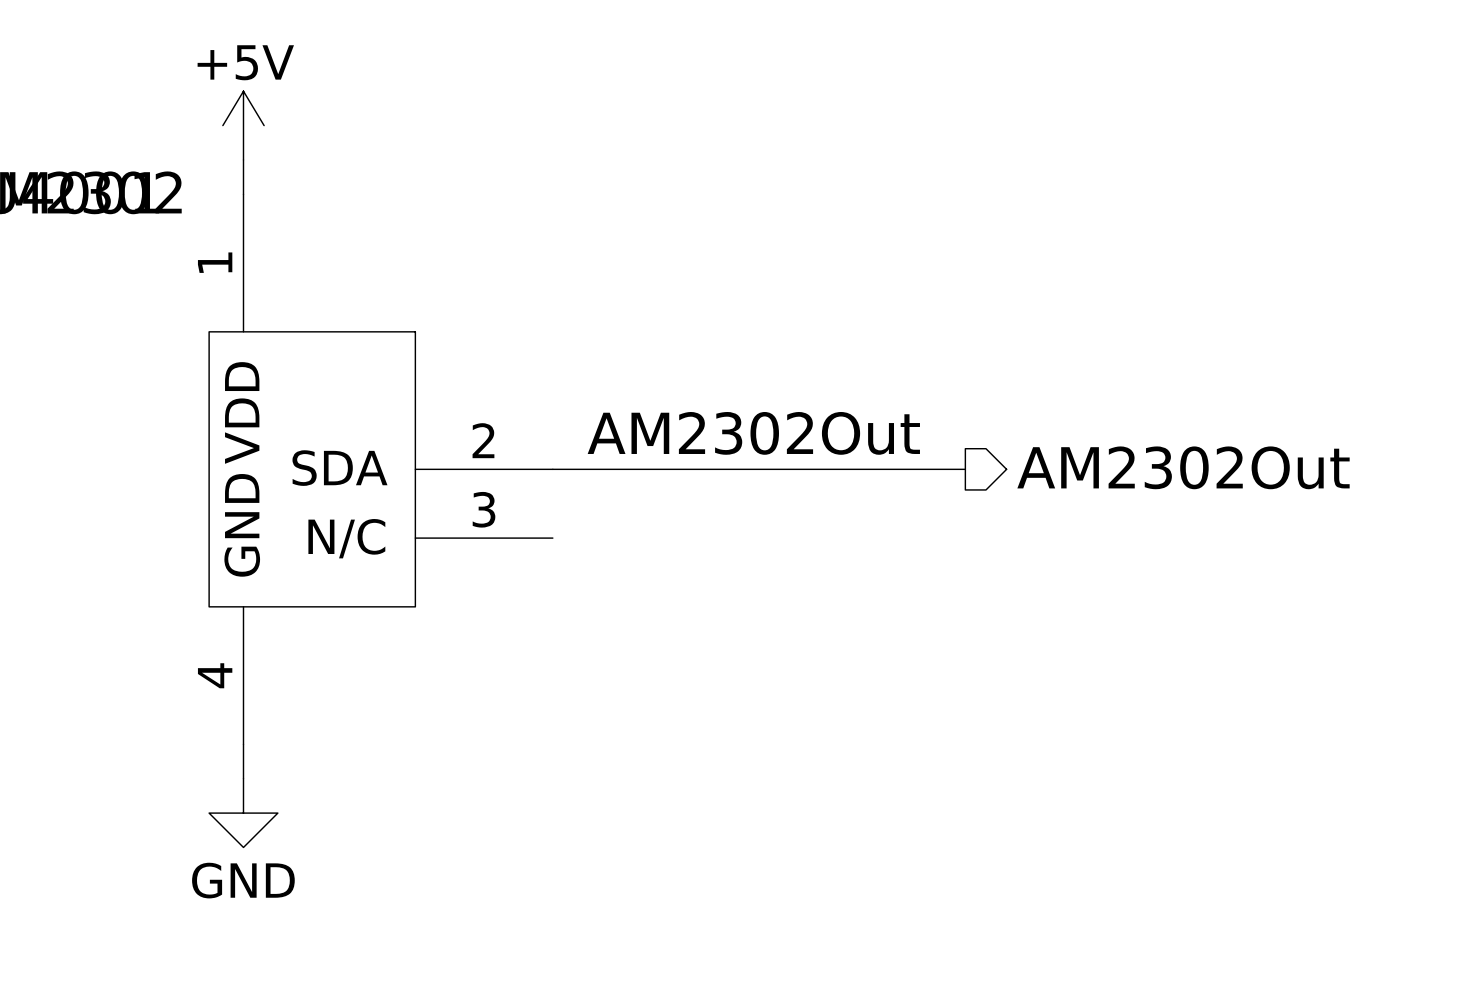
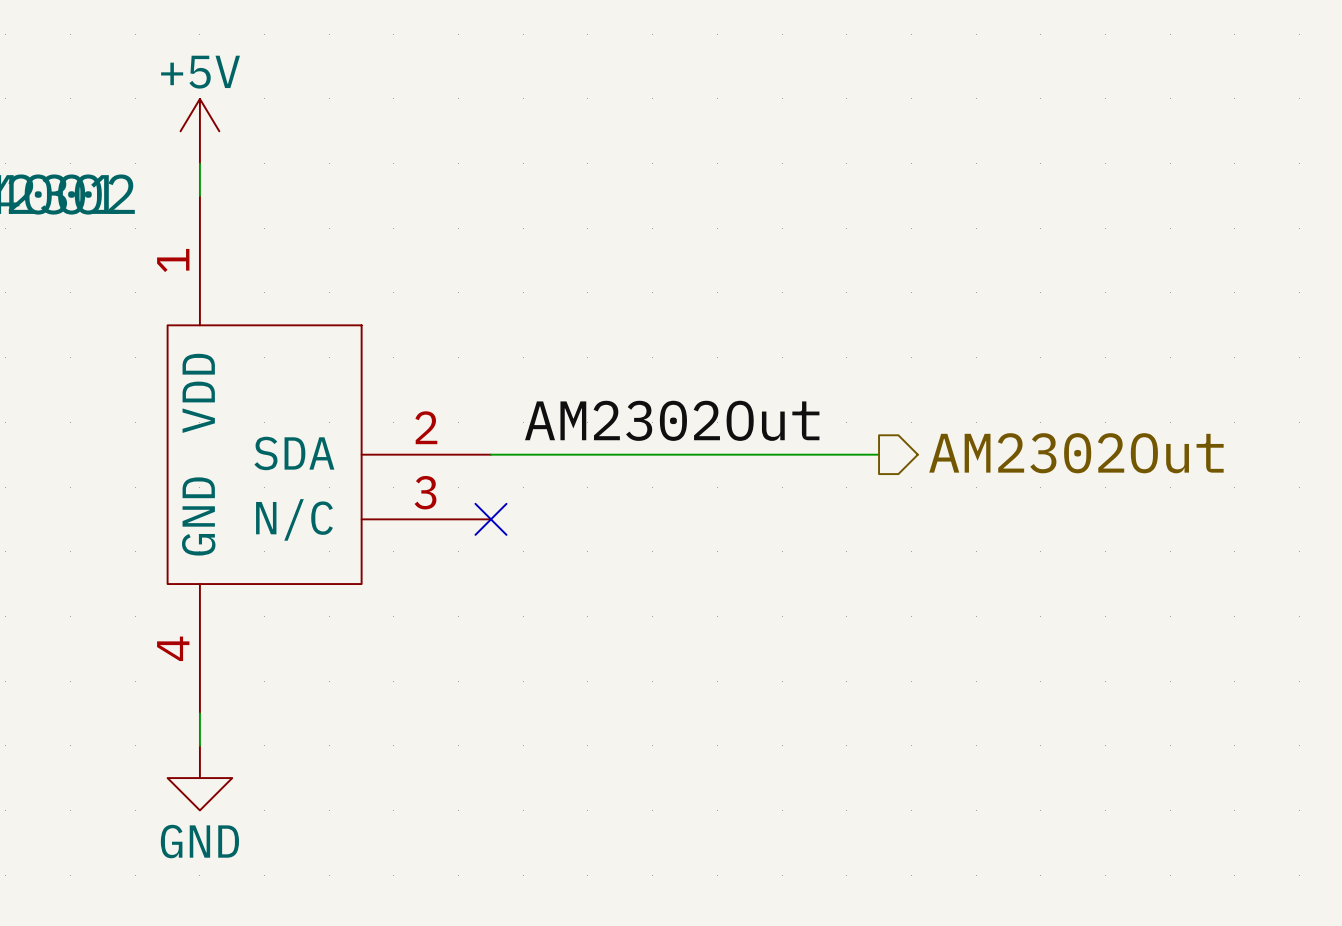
no-connect mark: none -> (490, 519)

